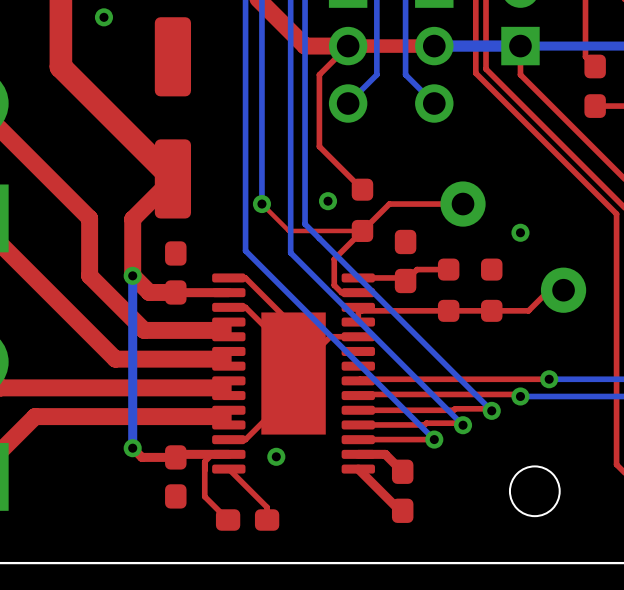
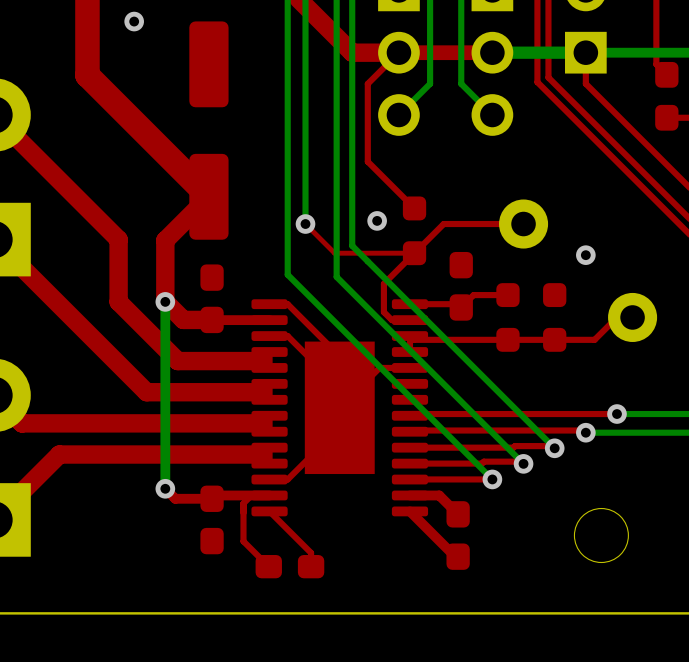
via: (276, 456) -> none

